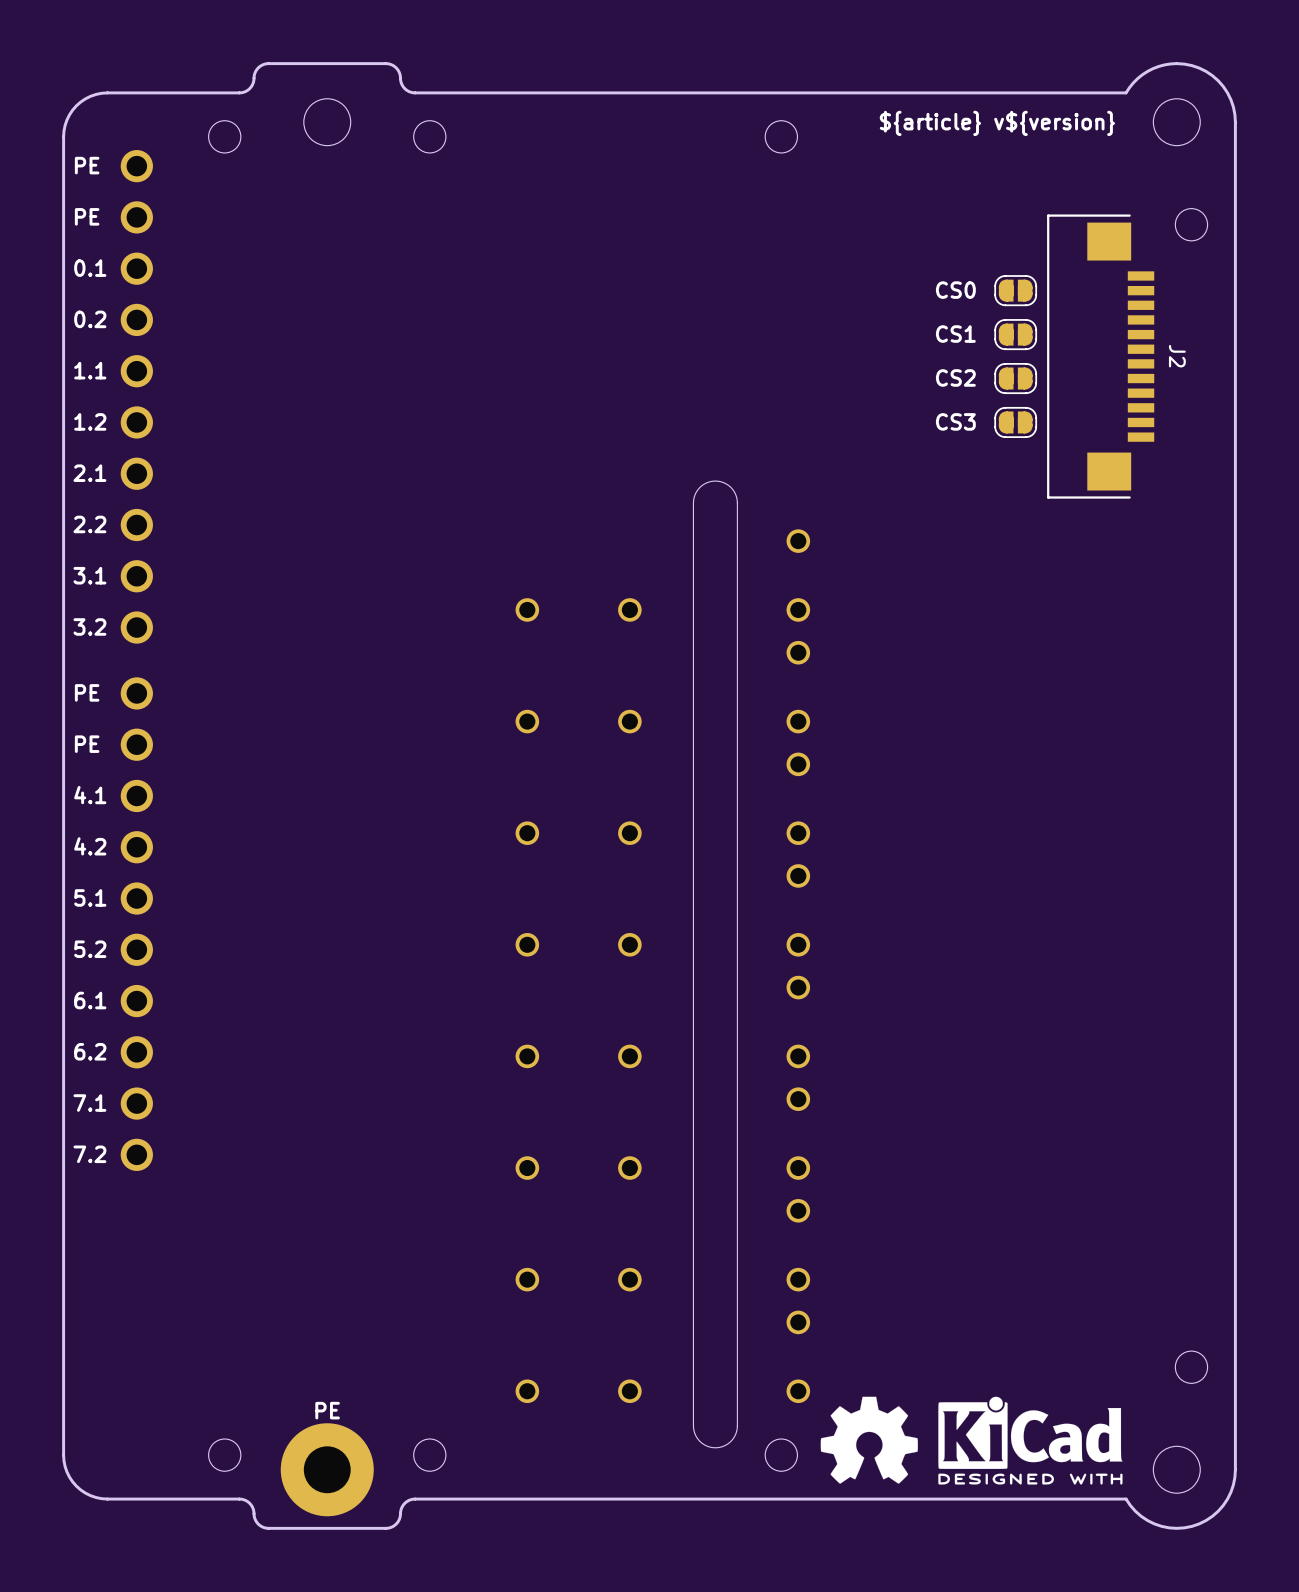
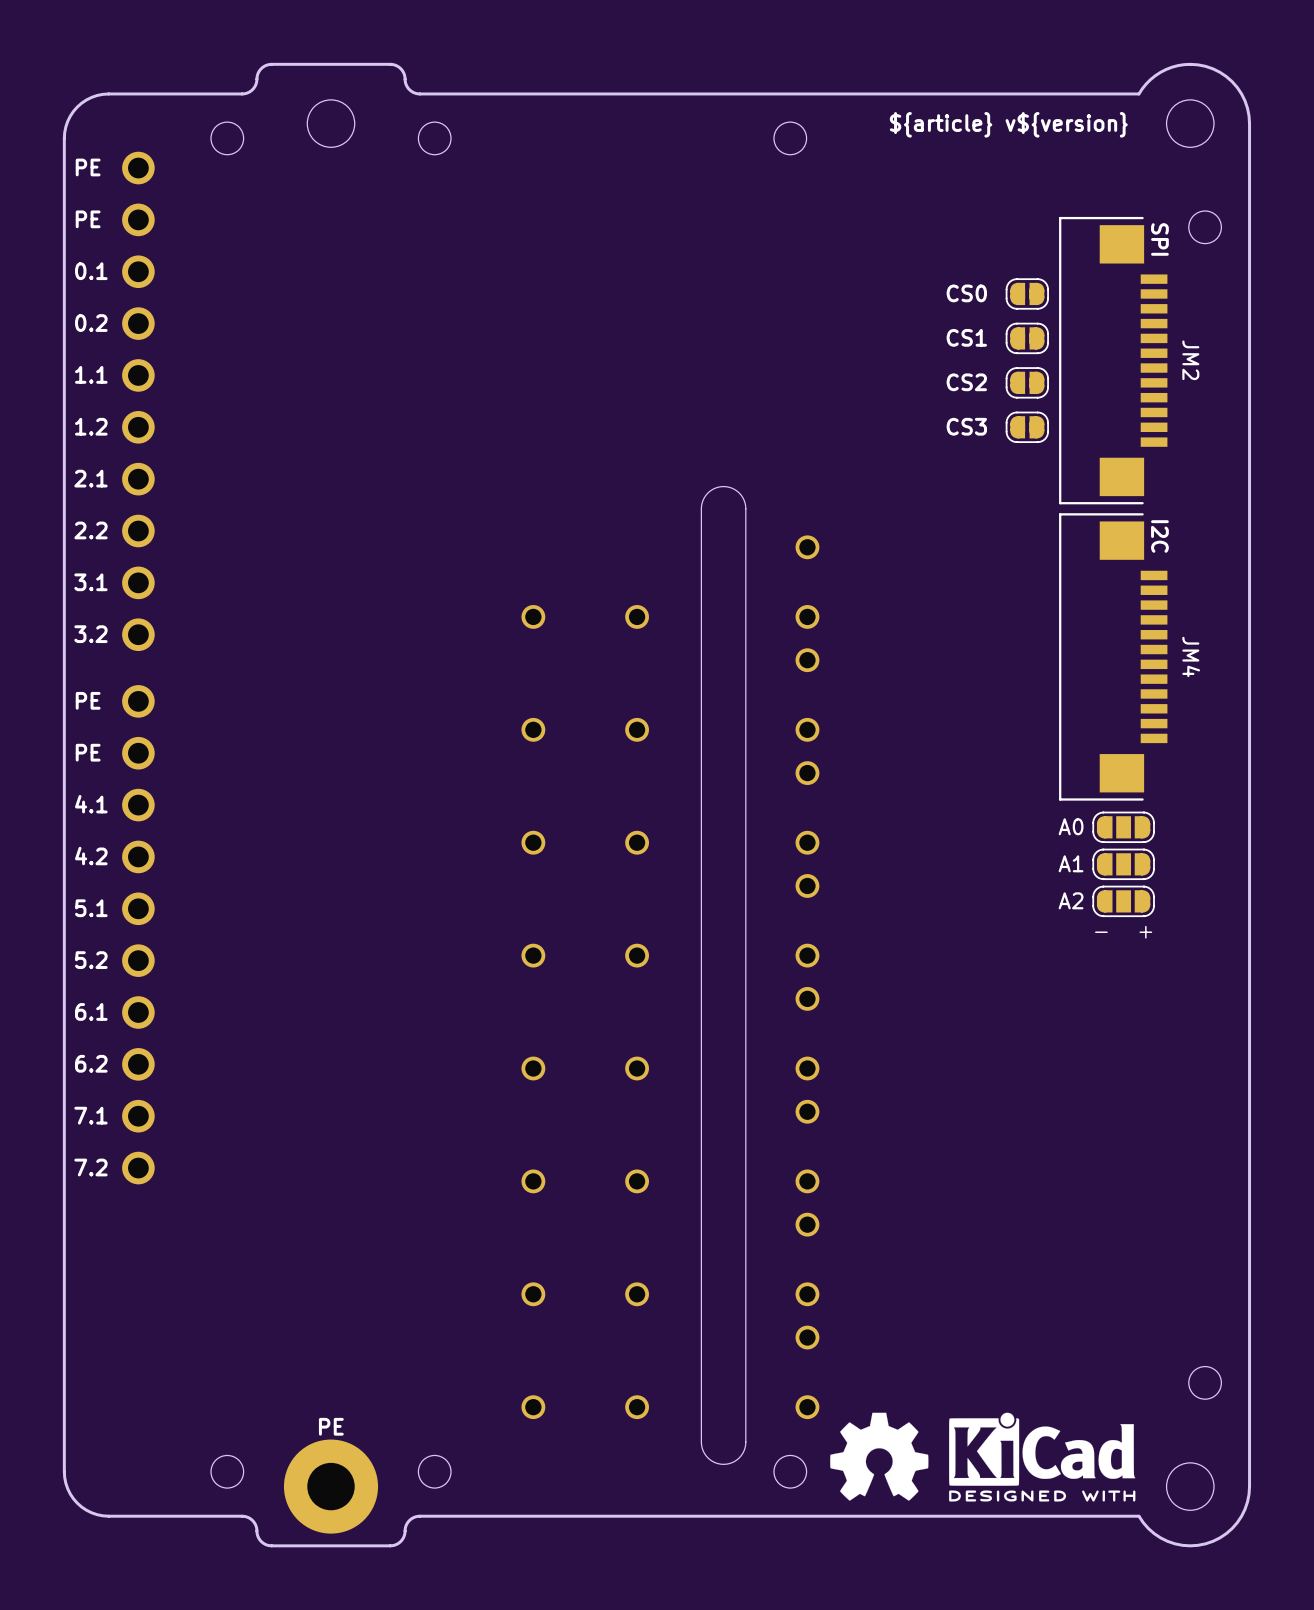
text: none -> SPI (1159, 239)
J2 name: J2 (1177, 356) -> JM2 (1190, 360)
text: none -> I2C (1159, 536)
JM4: none -> (1113, 656)
text: none -> A0 (1071, 826)
part: none -> (1123, 827)
text: none -> A1 (1071, 863)
part: none -> (1123, 864)
text: none -> A2 (1071, 900)
part: none -> (1123, 901)
text: none -> - (1101, 932)
text: none -> + (1145, 932)

